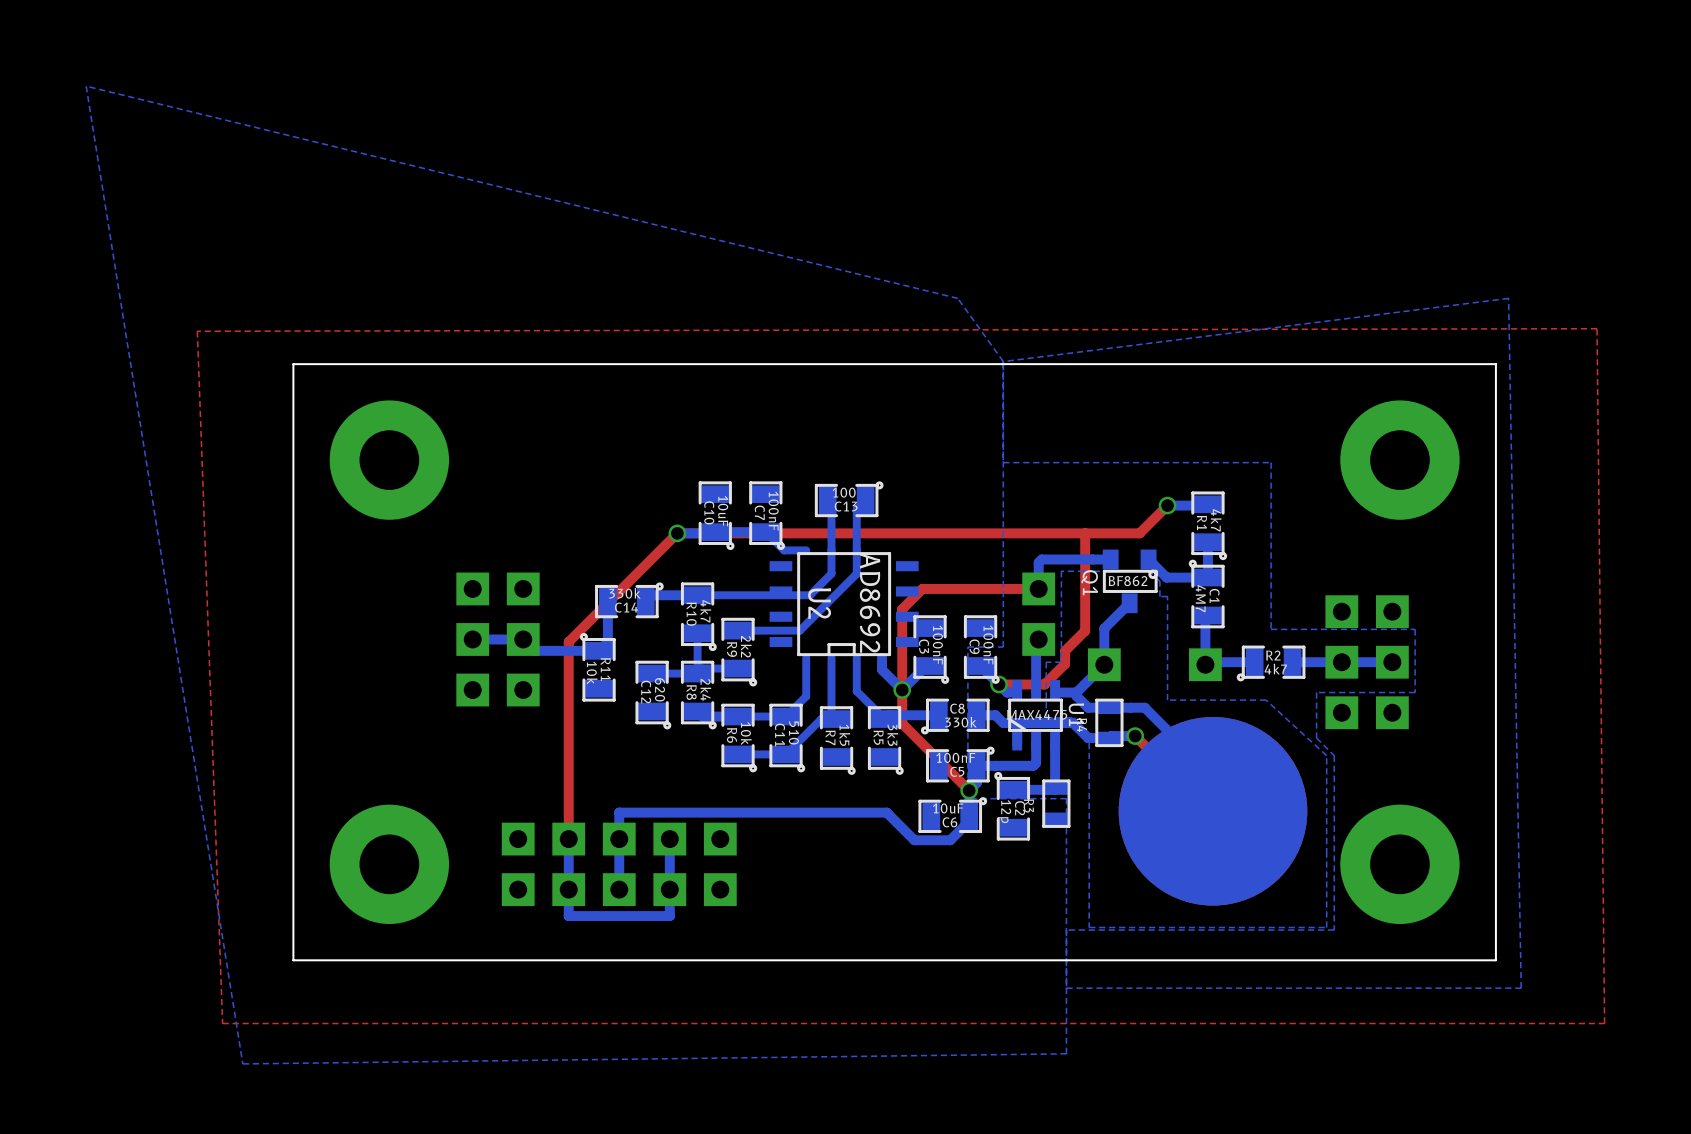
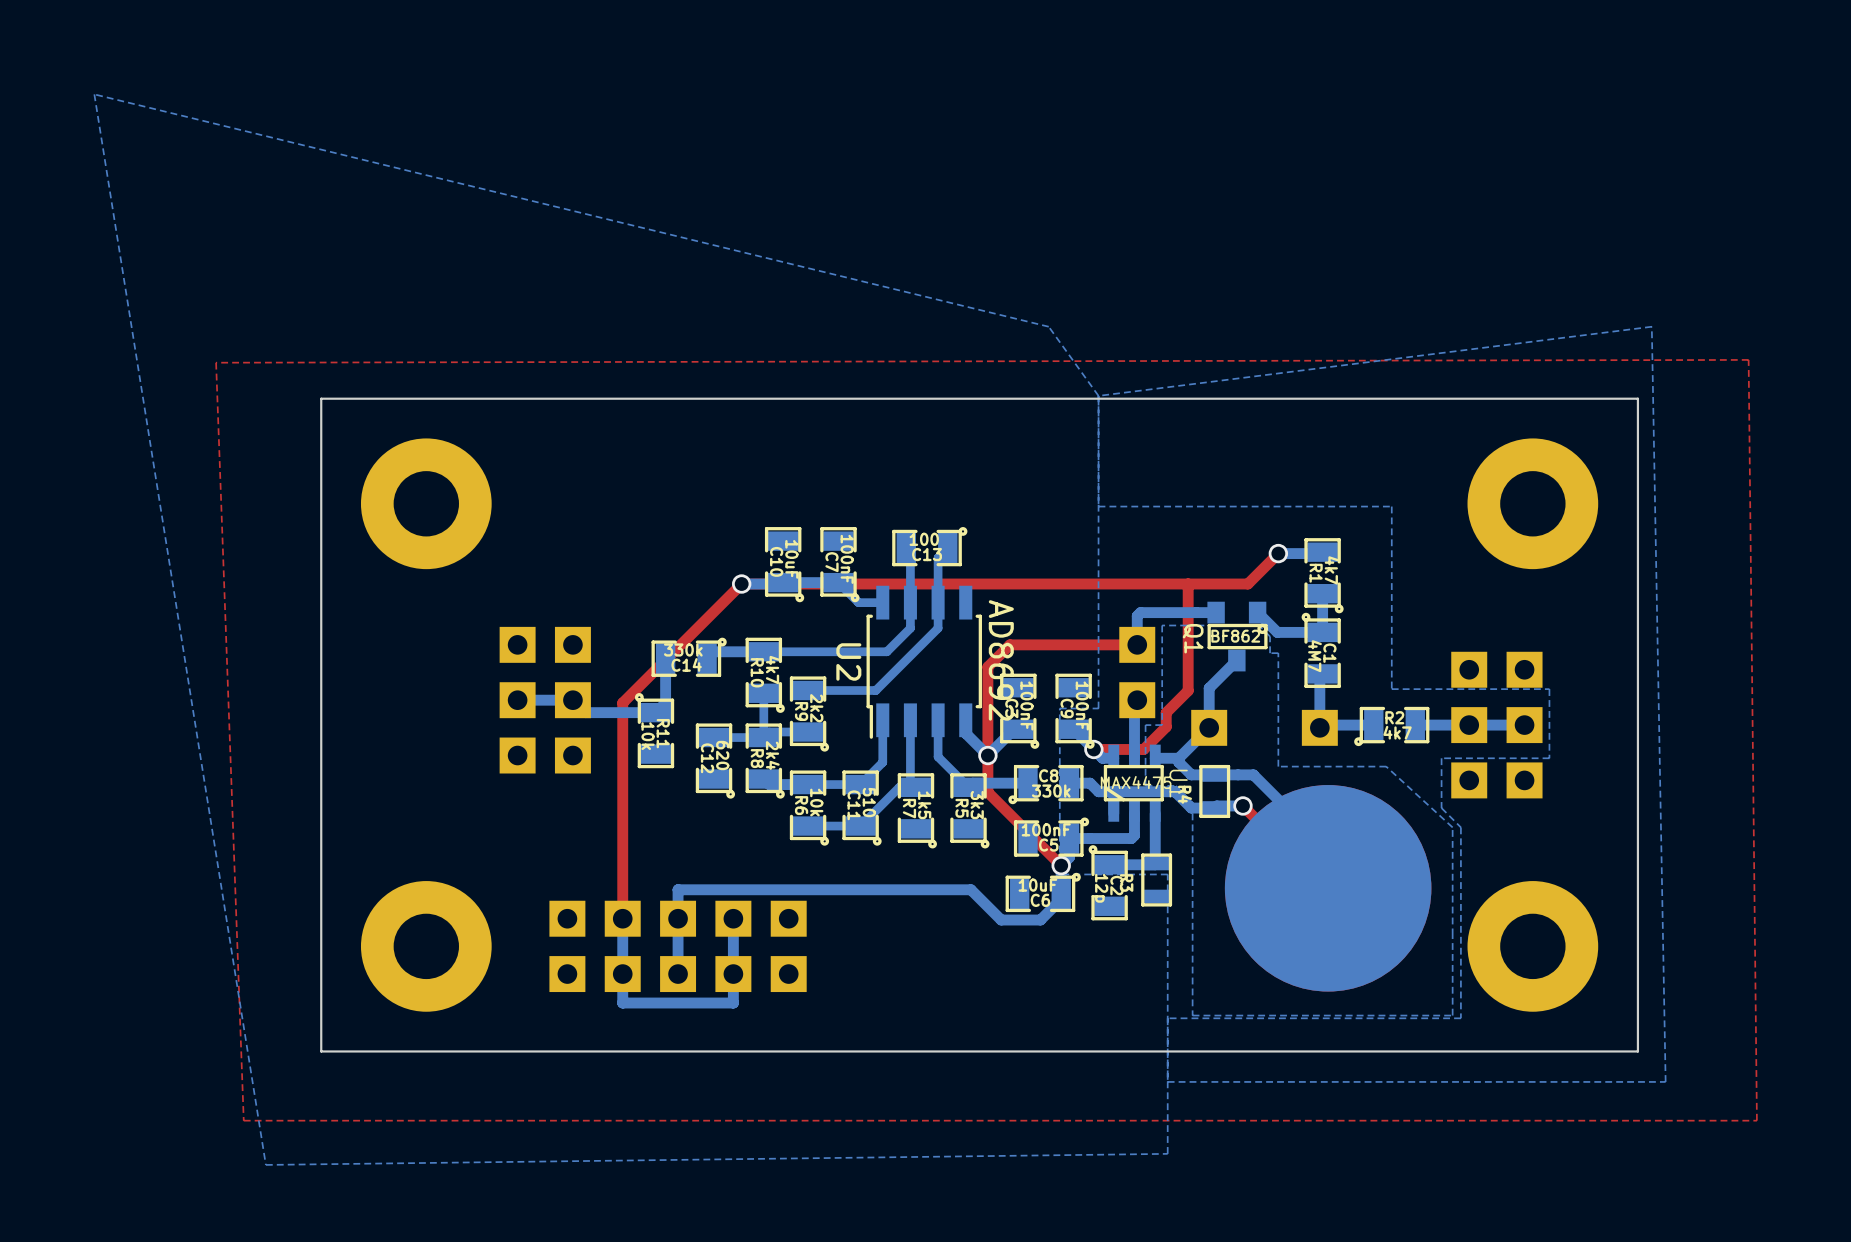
U2 footprint: [769, 552, 919, 657] -> [866, 585, 982, 739]
U2 value position: AD8692 (870, 602) -> AD8692 (1001, 660)
U2 name position: U2 (819, 603) -> U2 (848, 661)

